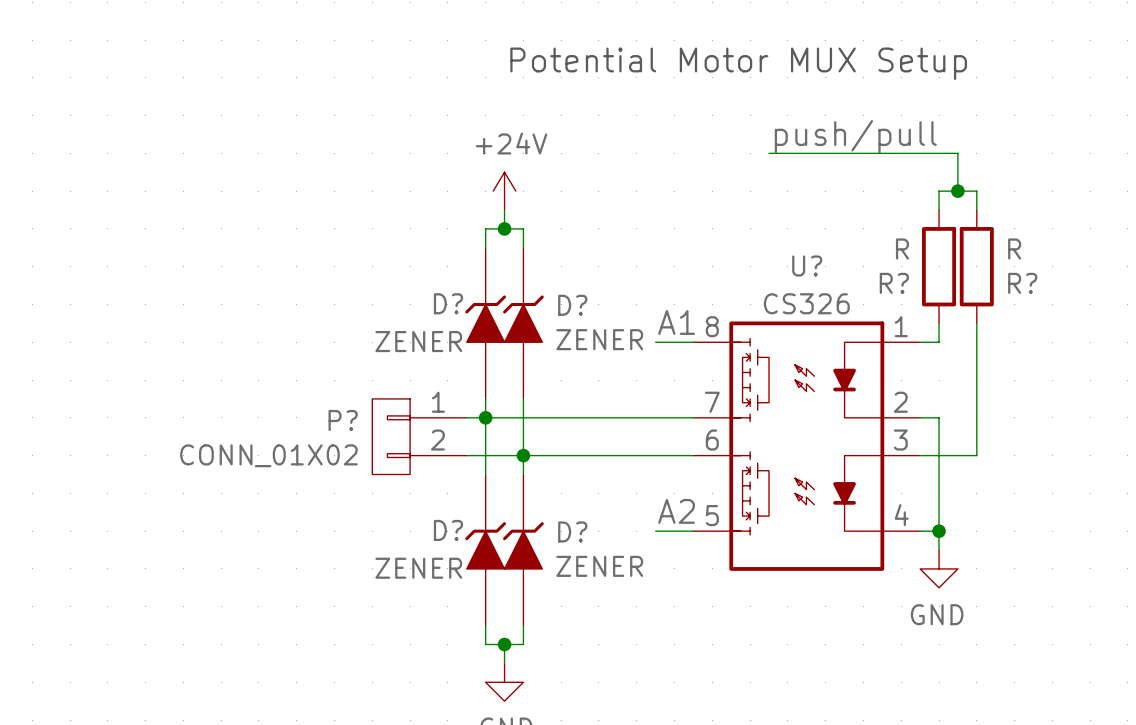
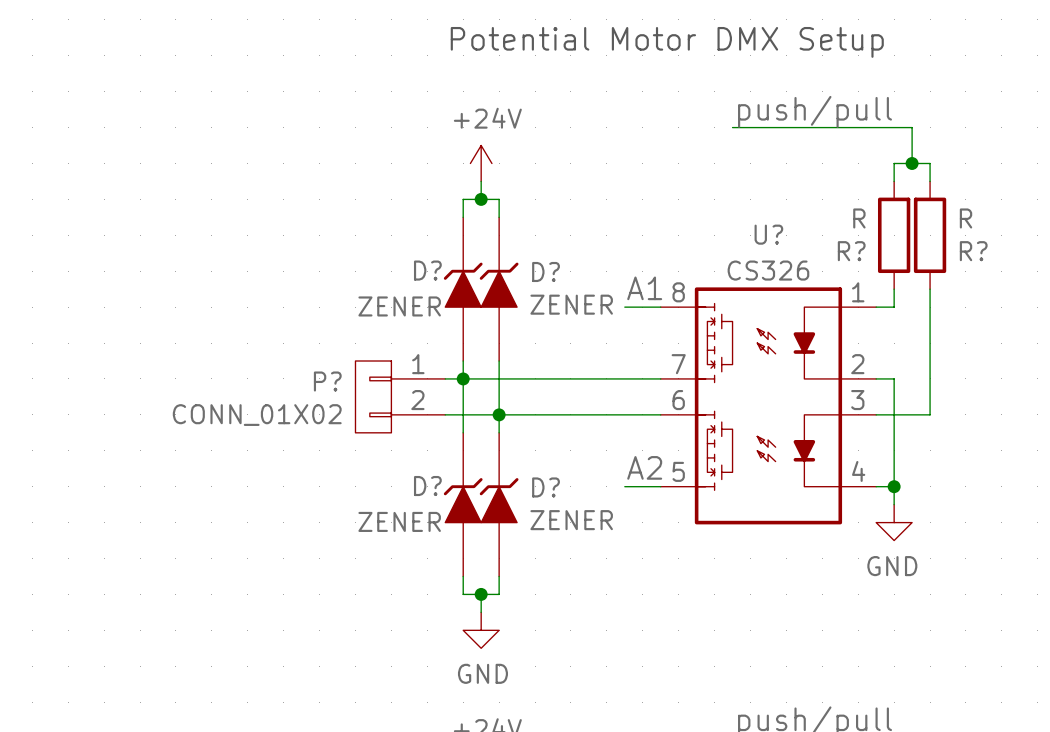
text: Potential Motor MUX Setup (738, 63) -> Potential Motor DMX Setup (667, 42)

